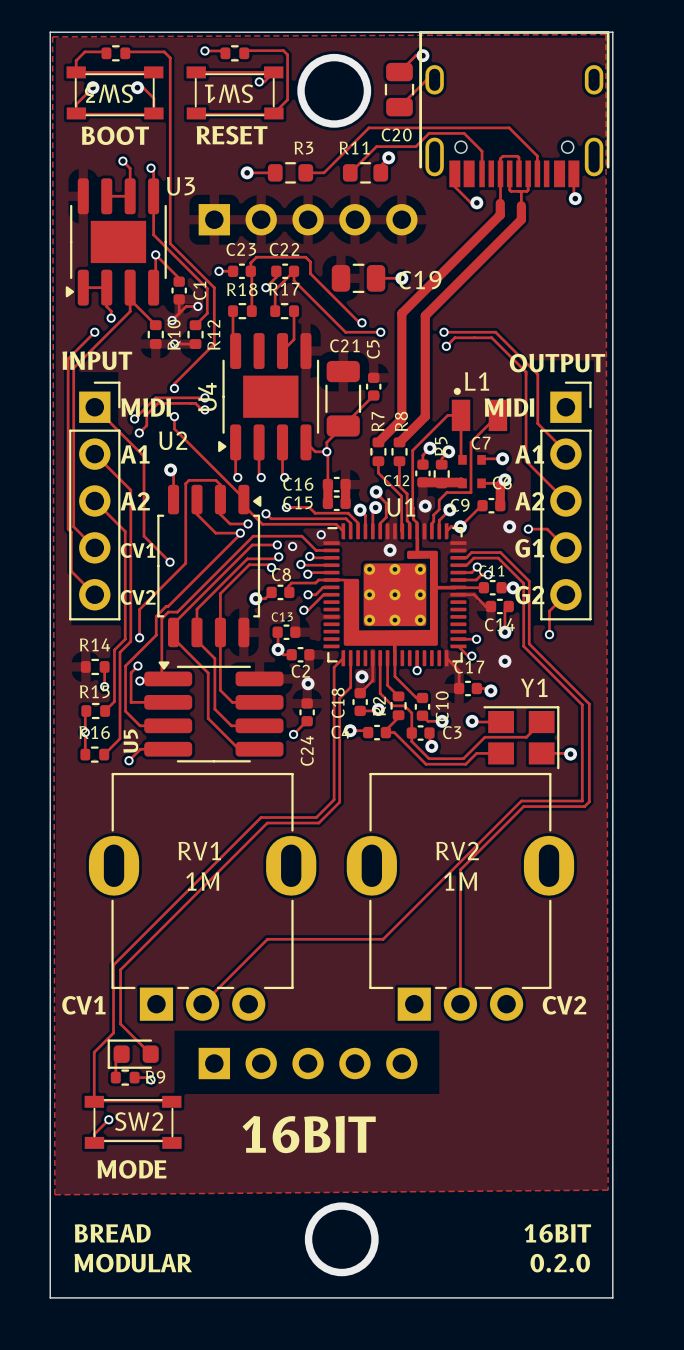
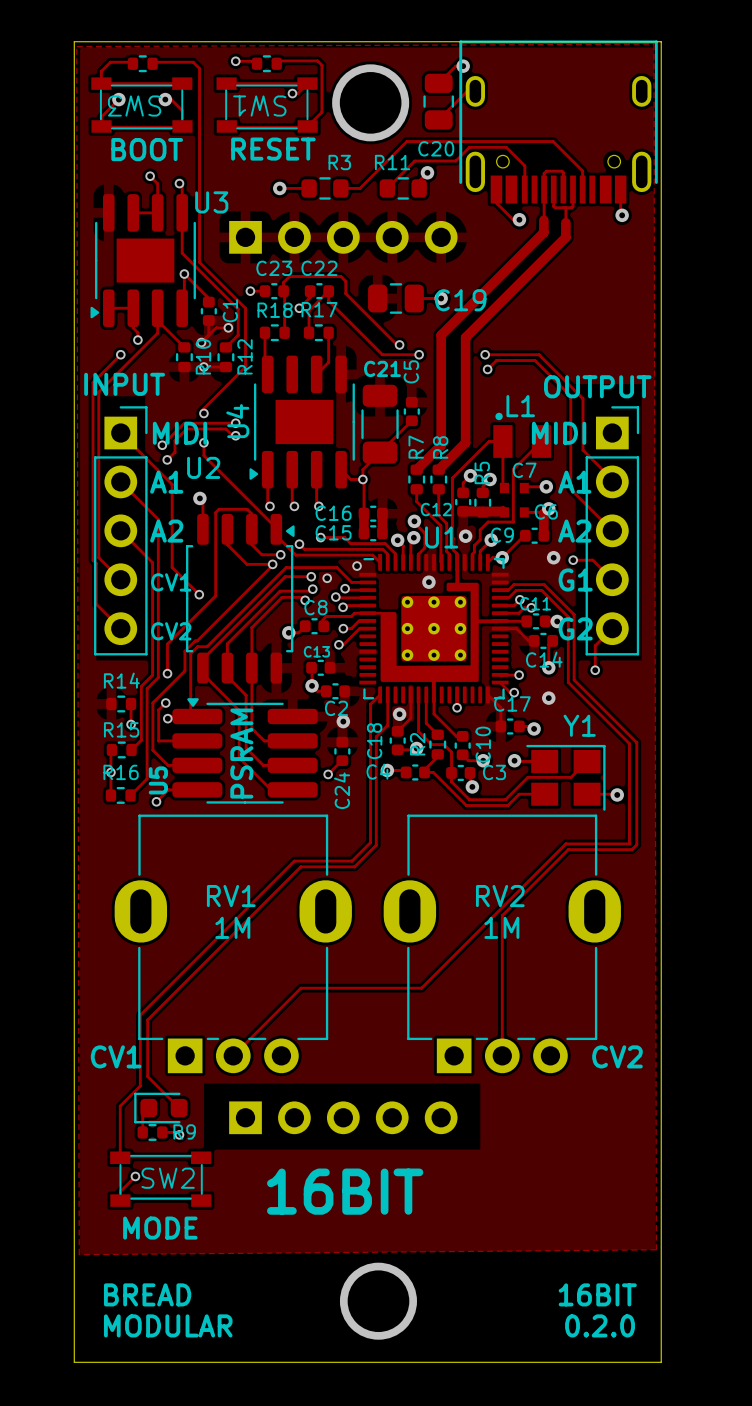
text: none -> PSRAM (241, 753)

